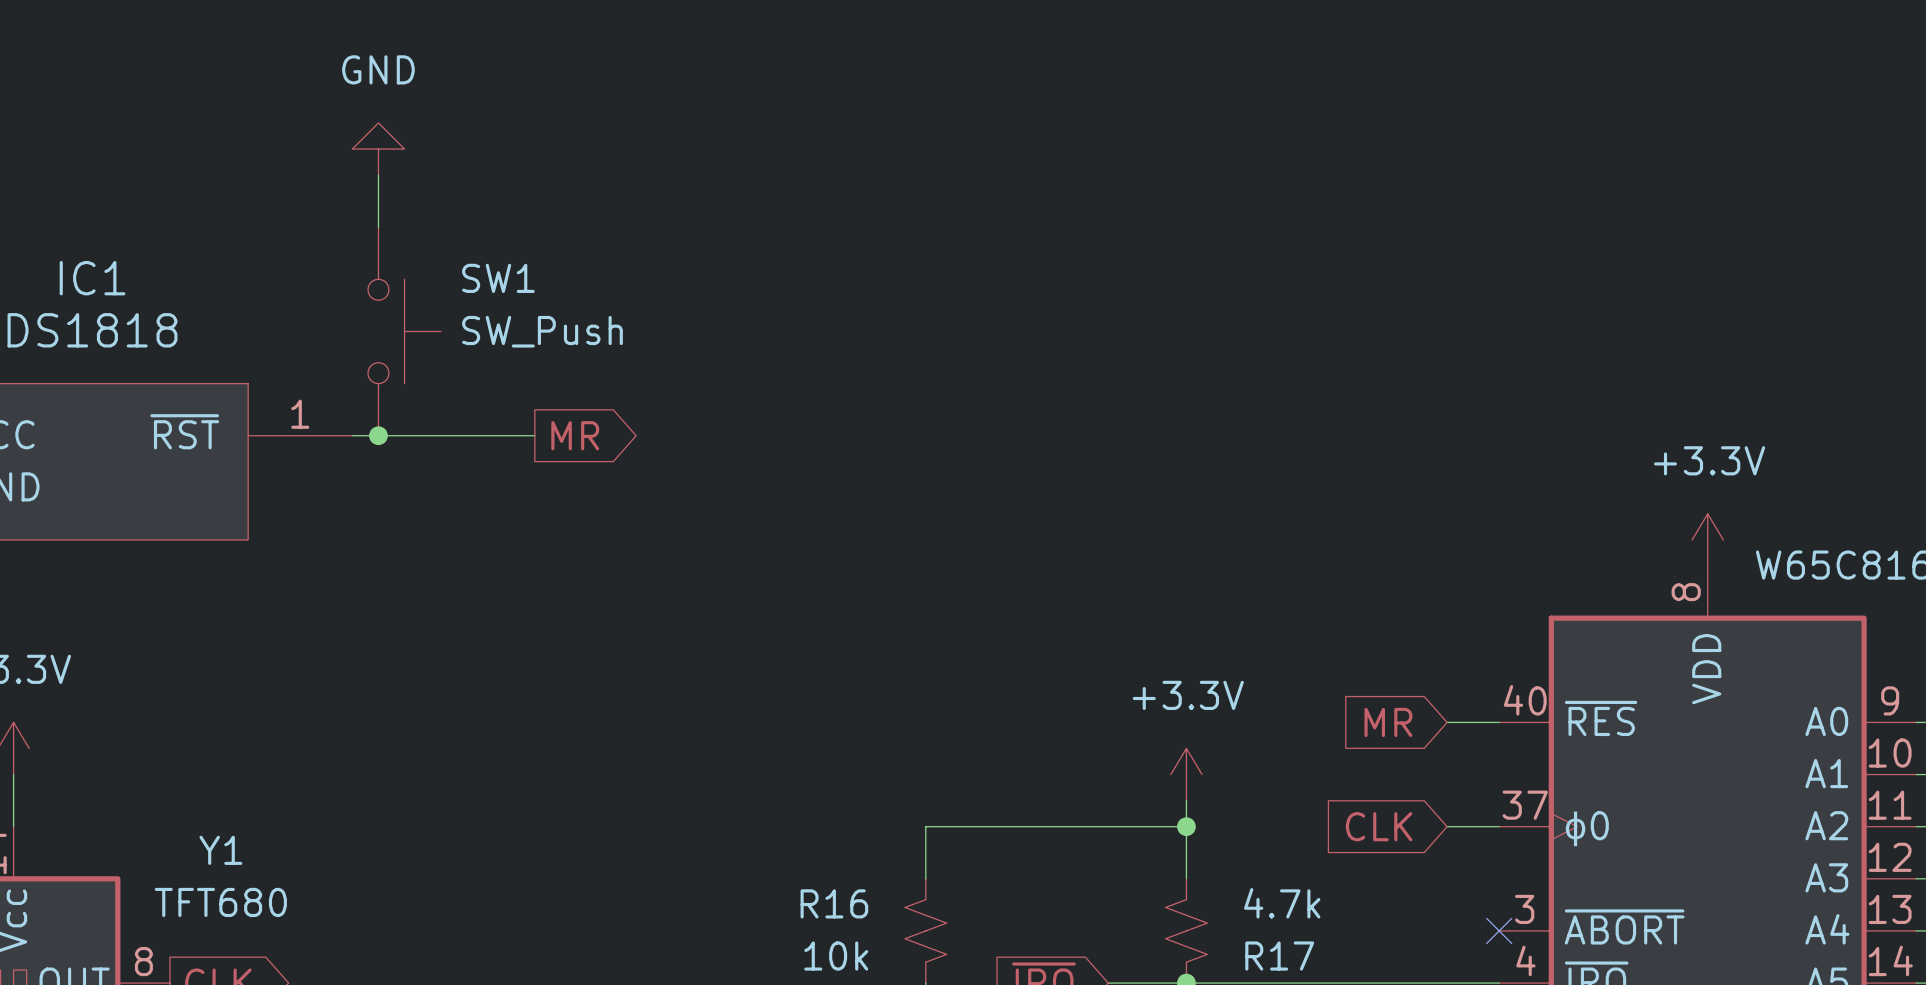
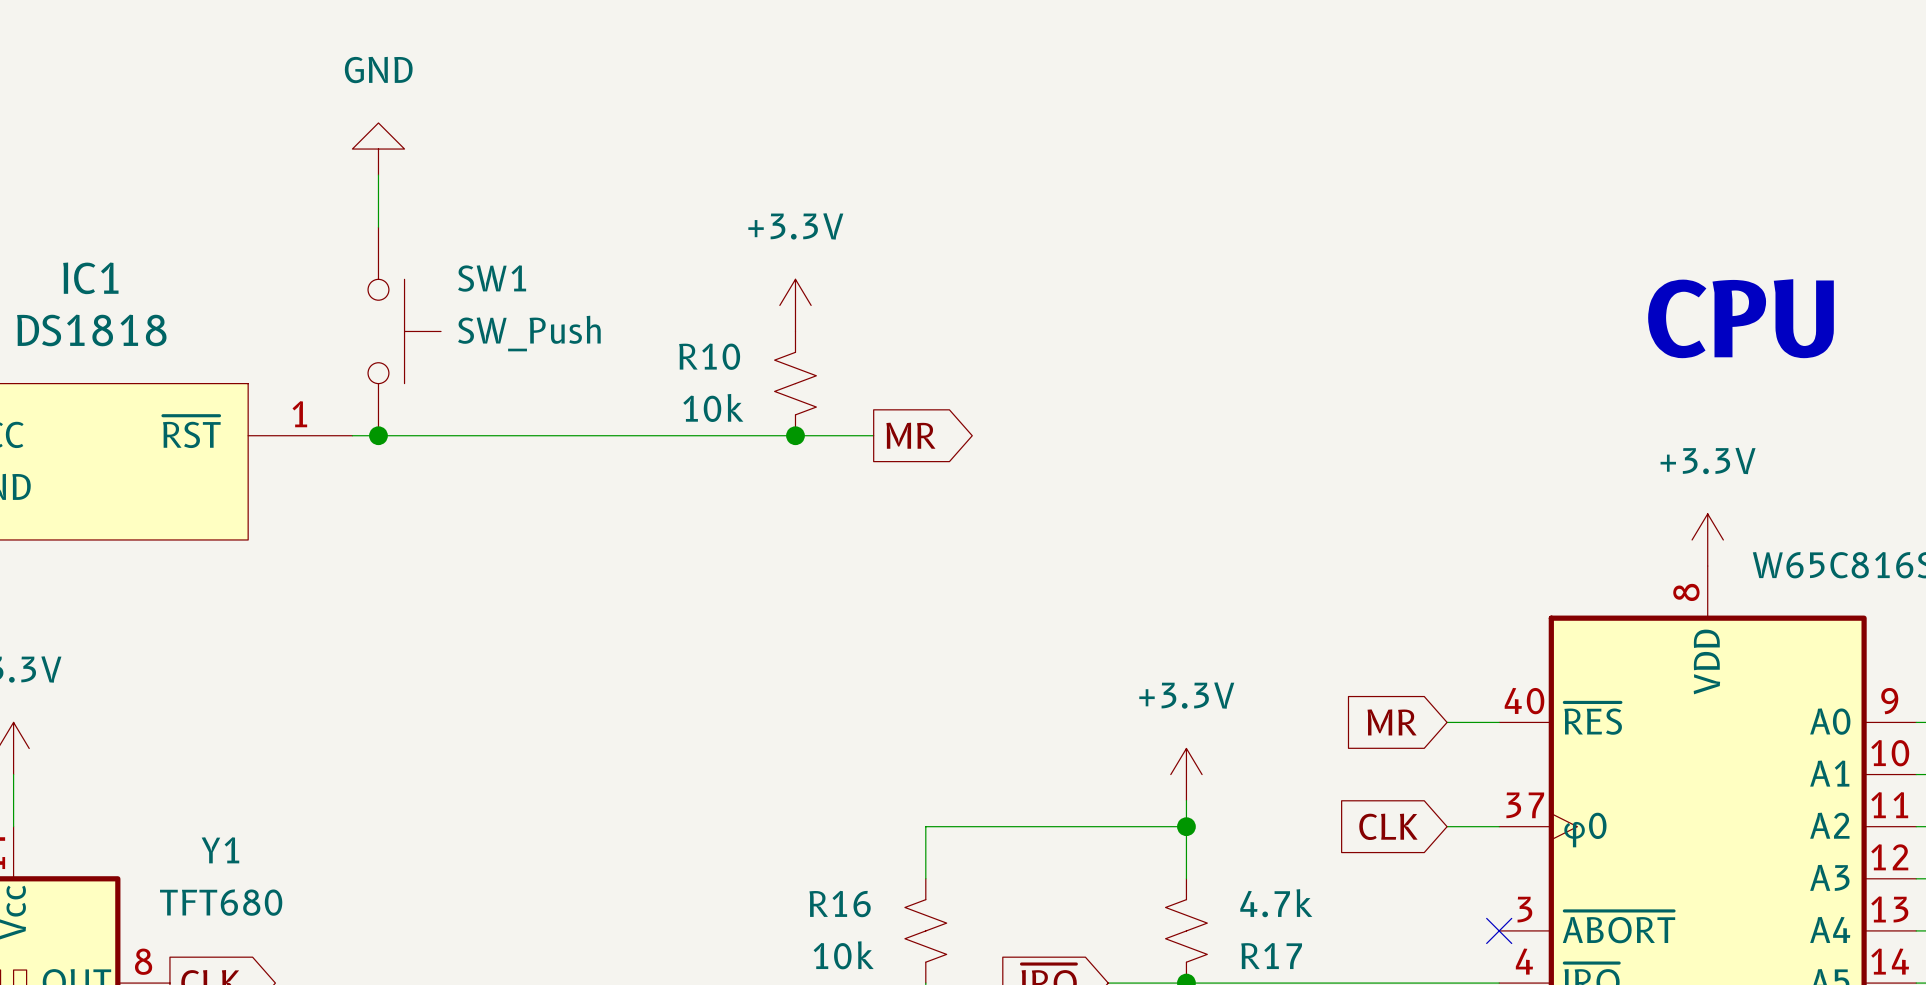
power symbol: none -> +3.3V (795, 305)
text: none -> CPU (1740, 318)
R10: none -> 10k (795, 383)
wire: none -> (534, 435) (873, 435)
global label position: MR (575, 435) -> MR (910, 435)
junction: none -> (795, 435)

